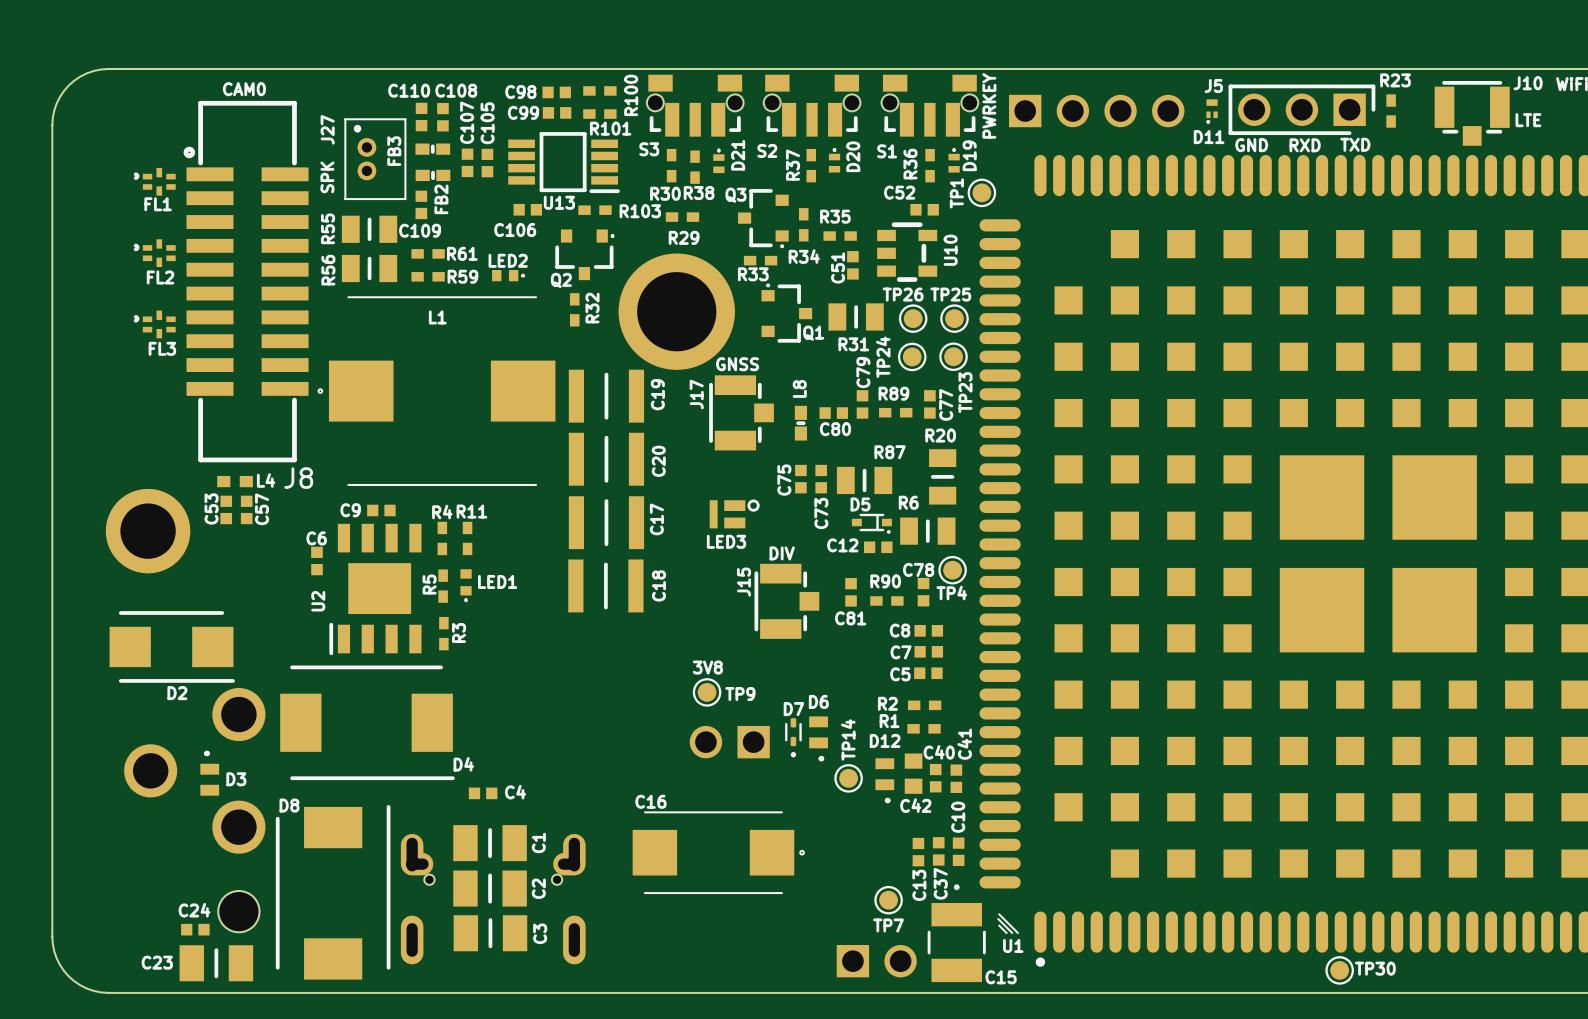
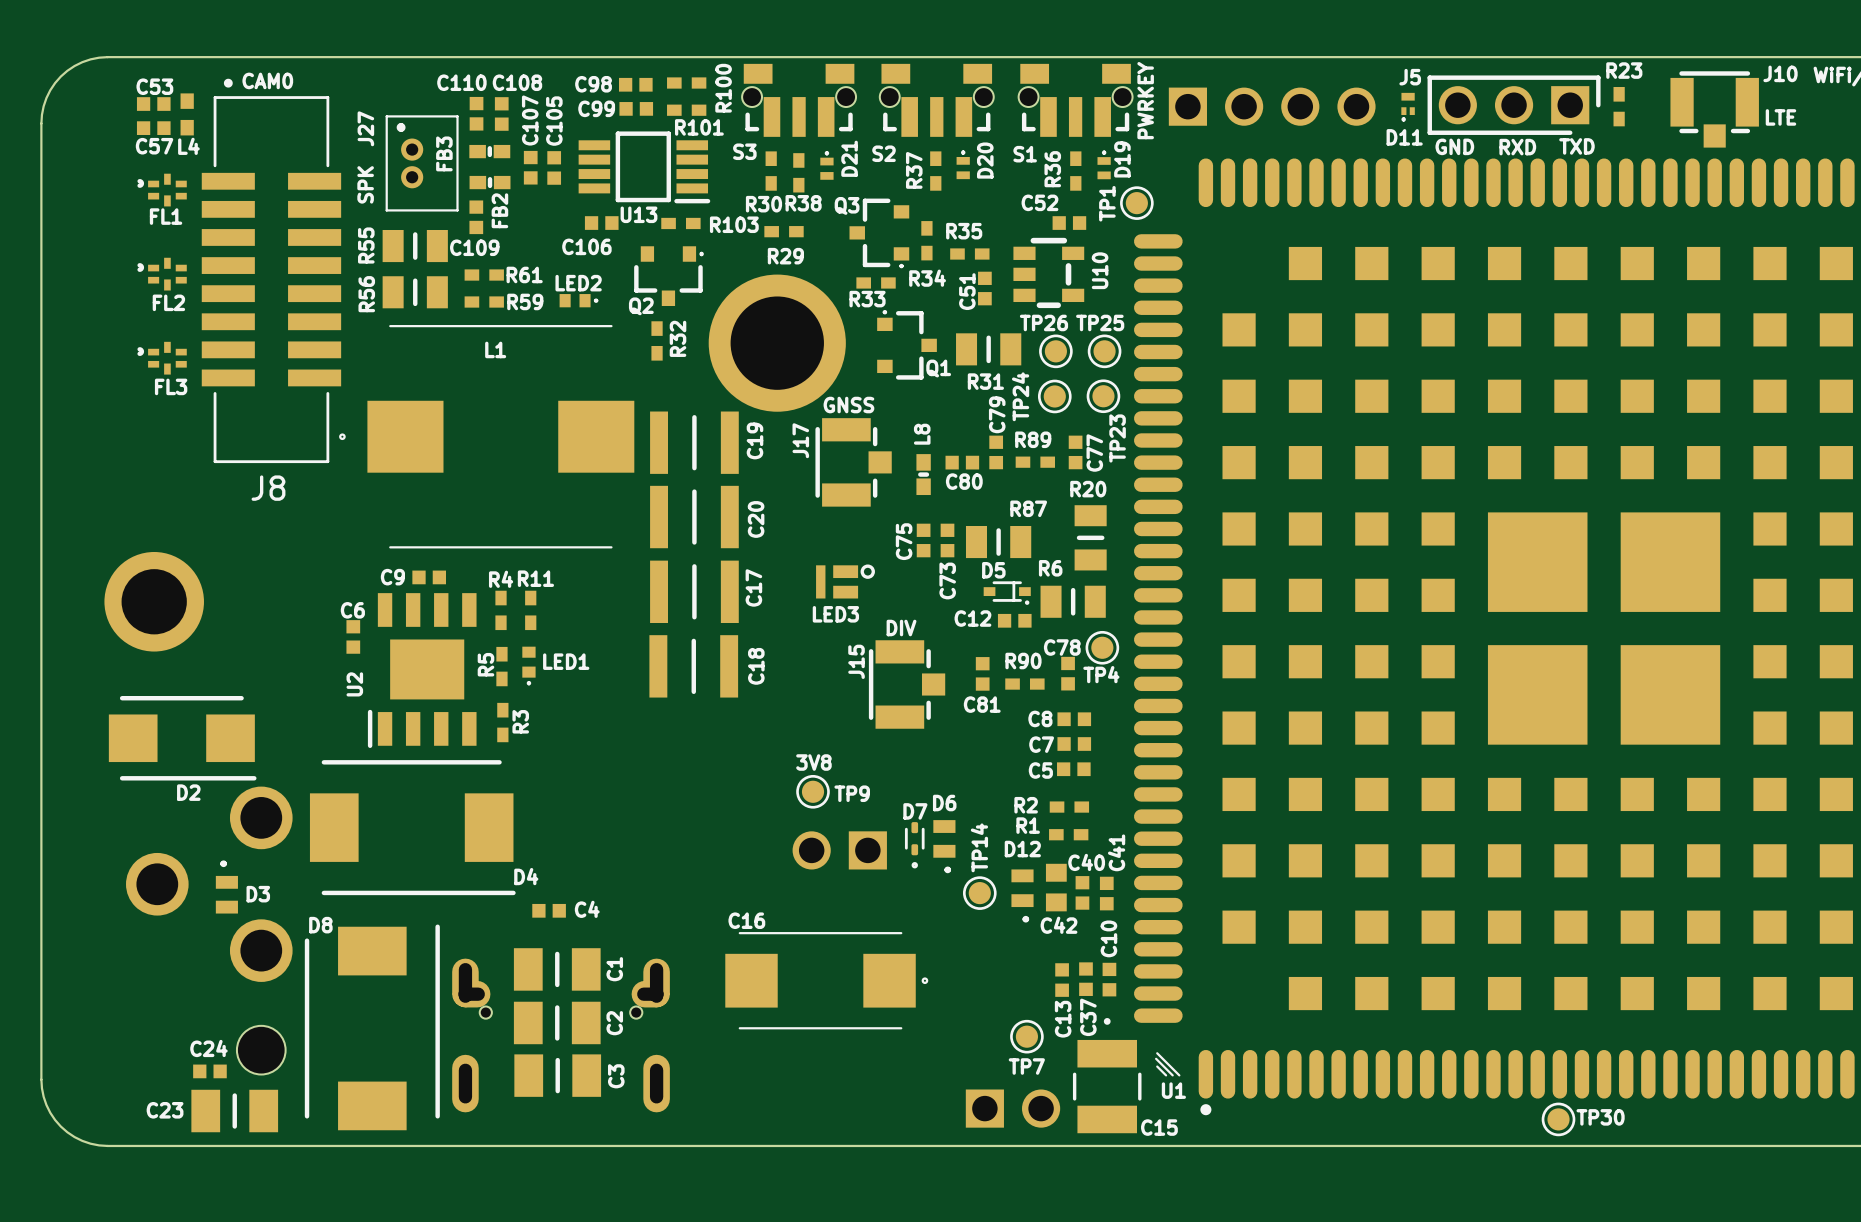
J8 footprint: [183, 100, 309, 463] -> [201, 78, 342, 464]
L1 footprint: [317, 296, 556, 486] -> [339, 325, 635, 549]
J8 name position: J8 (298, 478) -> J8 (268, 488)
L4 rotation: 0° (235, 481) -> 90° clockwise (187, 114)
L4 position: (235, 481) -> (187, 114)
C53 rotation: 0° (226, 509) -> 90° clockwise (153, 104)
C53 position: (226, 509) -> (153, 104)
C57 rotation: 0° (246, 509) -> 90° clockwise (153, 128)
C57 position: (246, 509) -> (153, 128)

